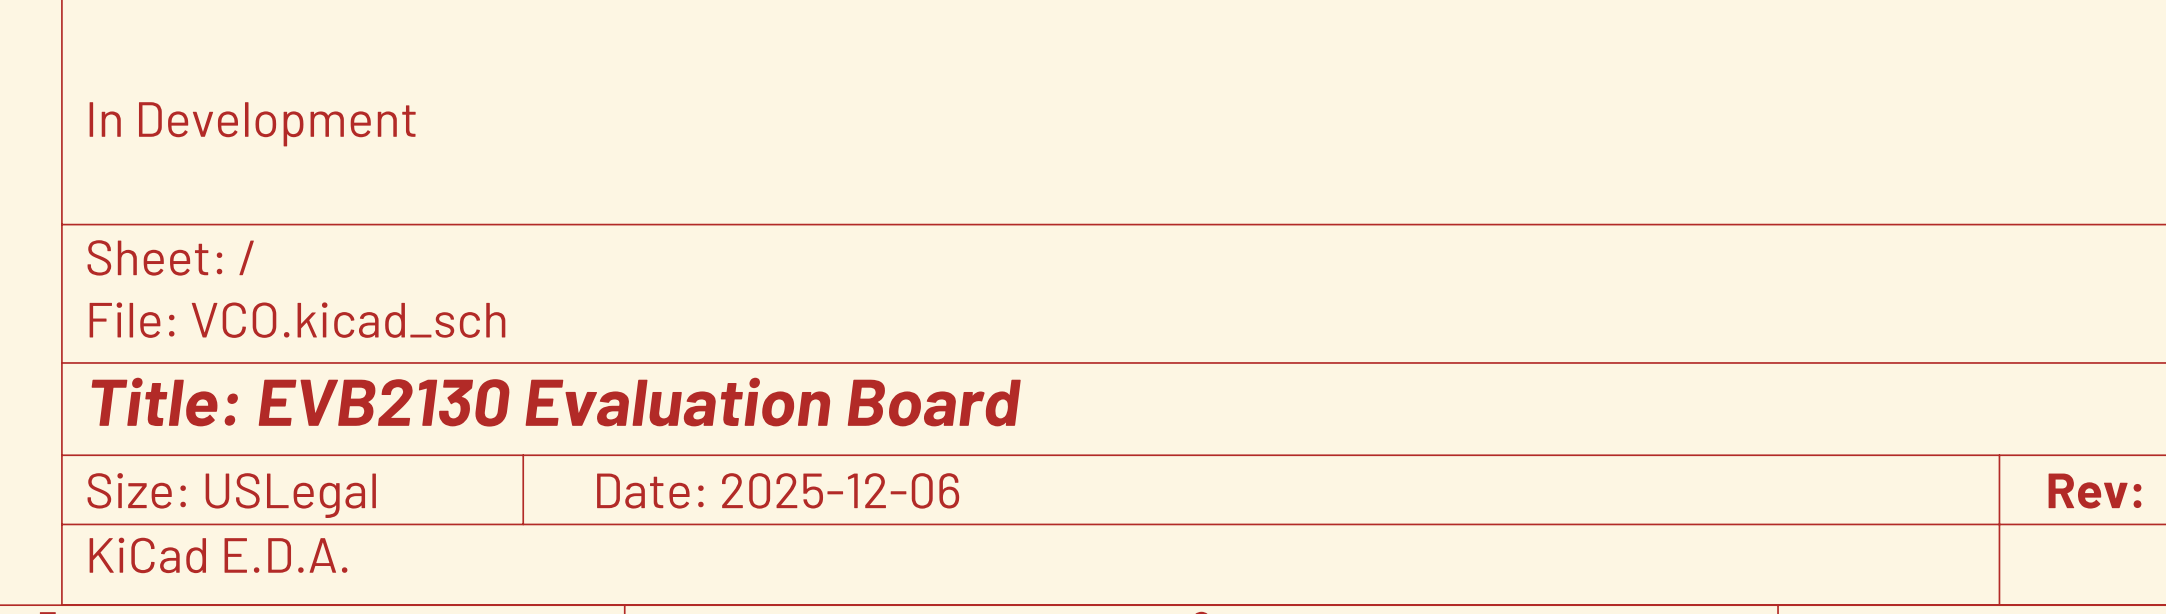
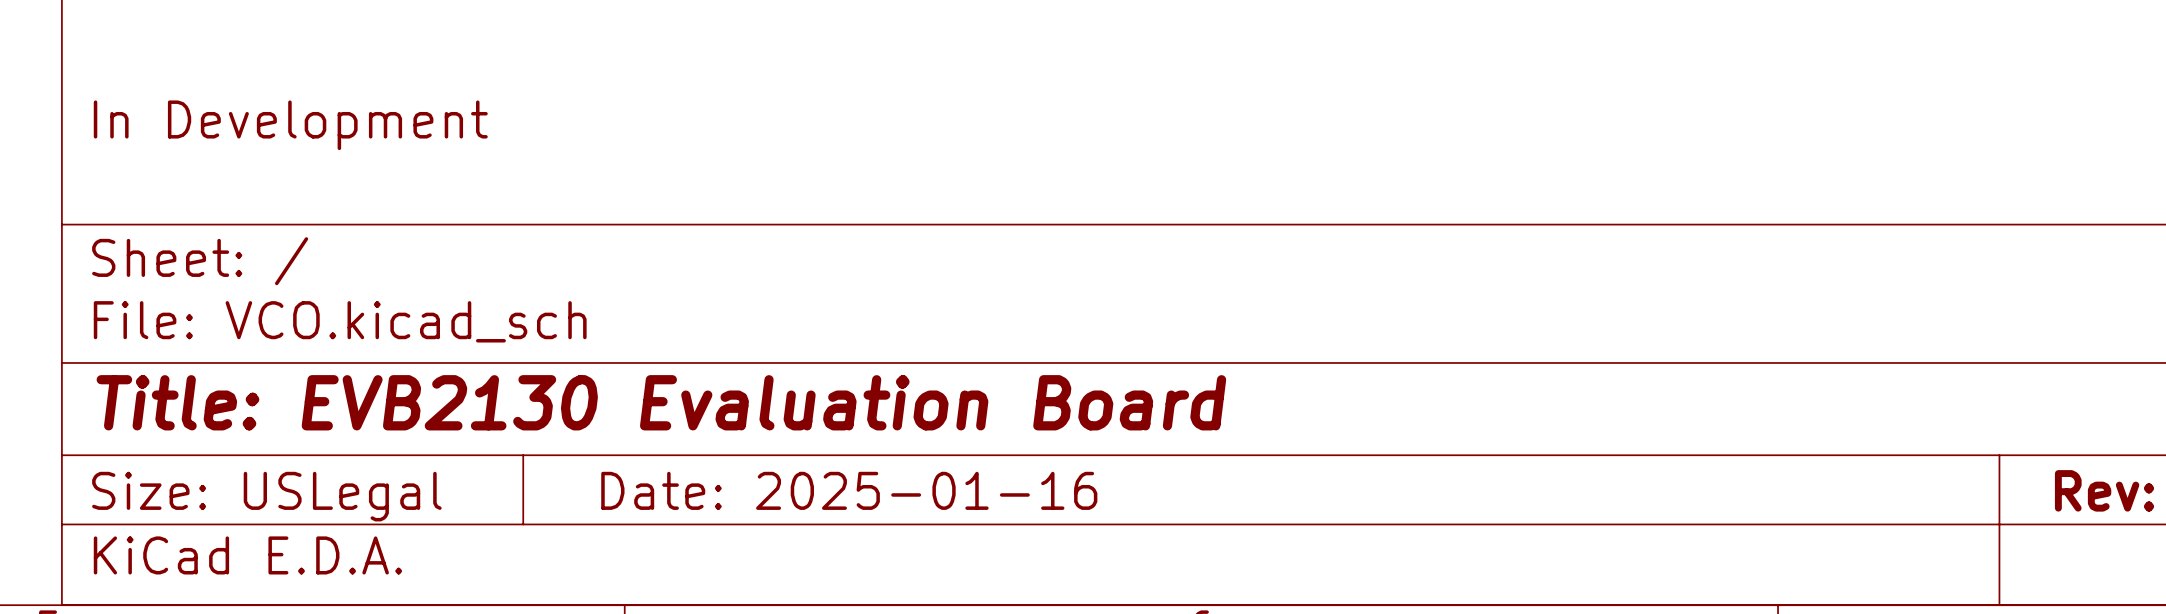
title block: Date: 2025-12-06 (778, 490) -> Date: 2025-01-16 (849, 490)

